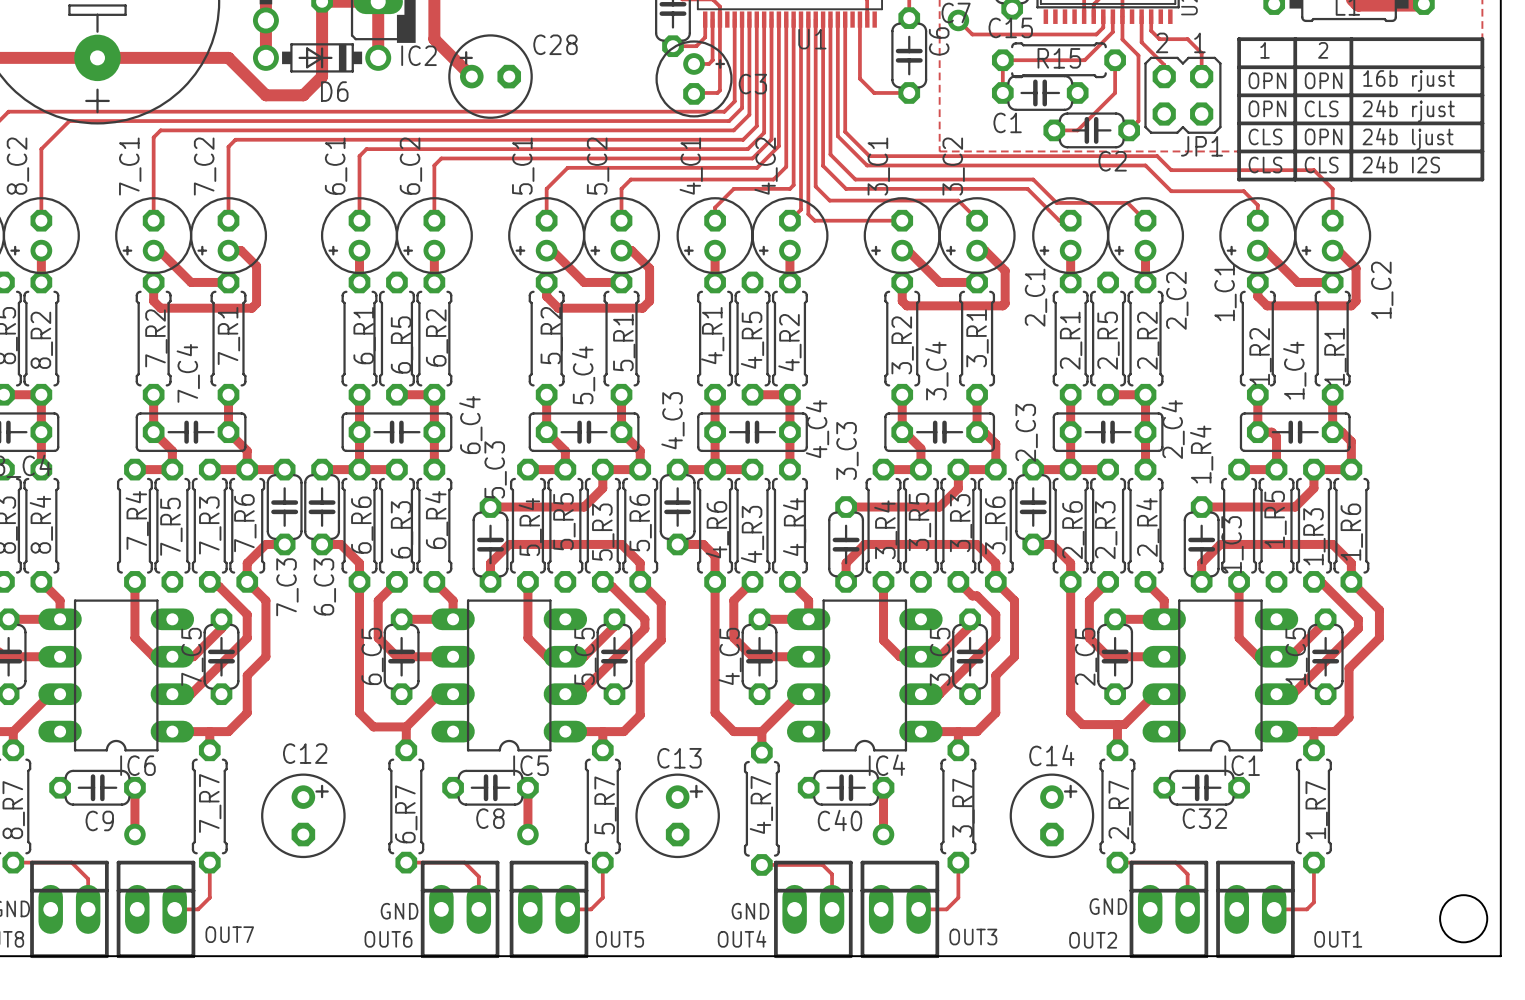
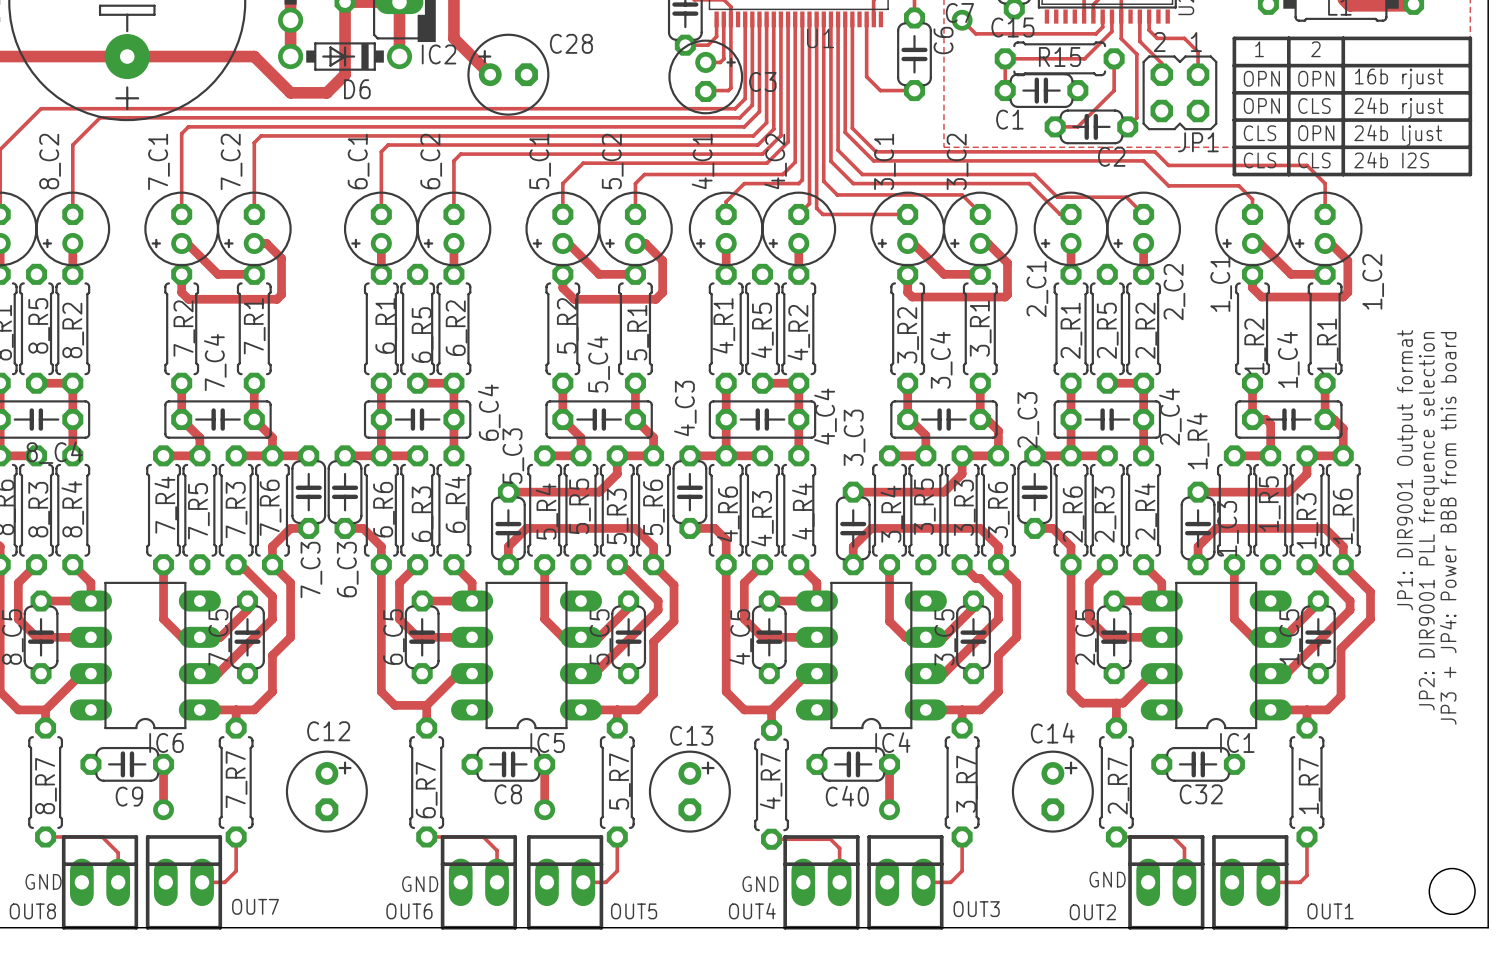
text: none -> JP1: DIR9001 Output format (1407, 470)
text: none -> JP2: DIR9001 PLL frequence selection (1429, 521)
text: none -> JP3 + JP4: Power BBB from this board (1448, 528)

